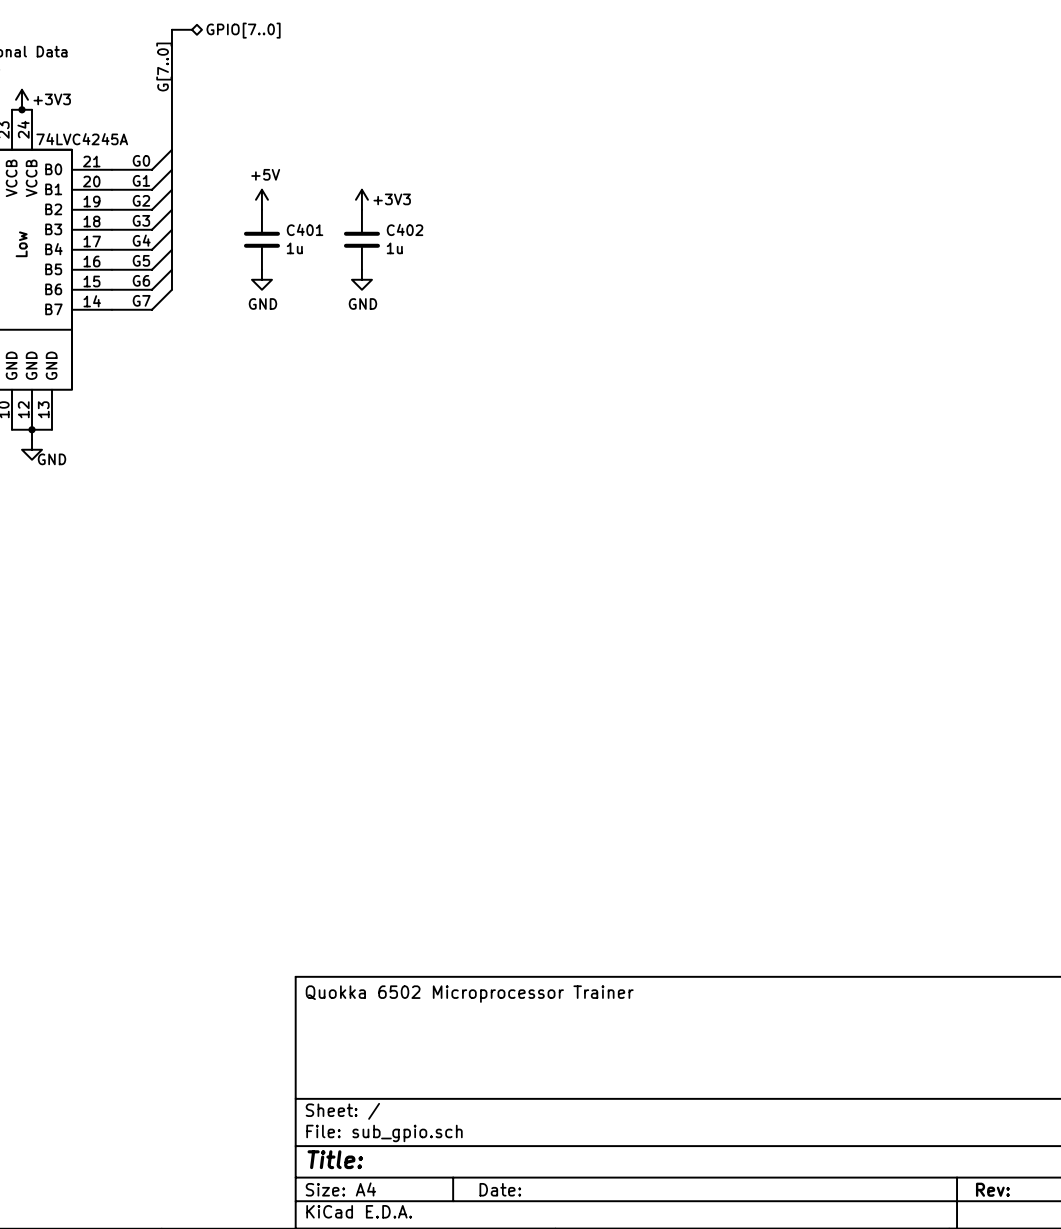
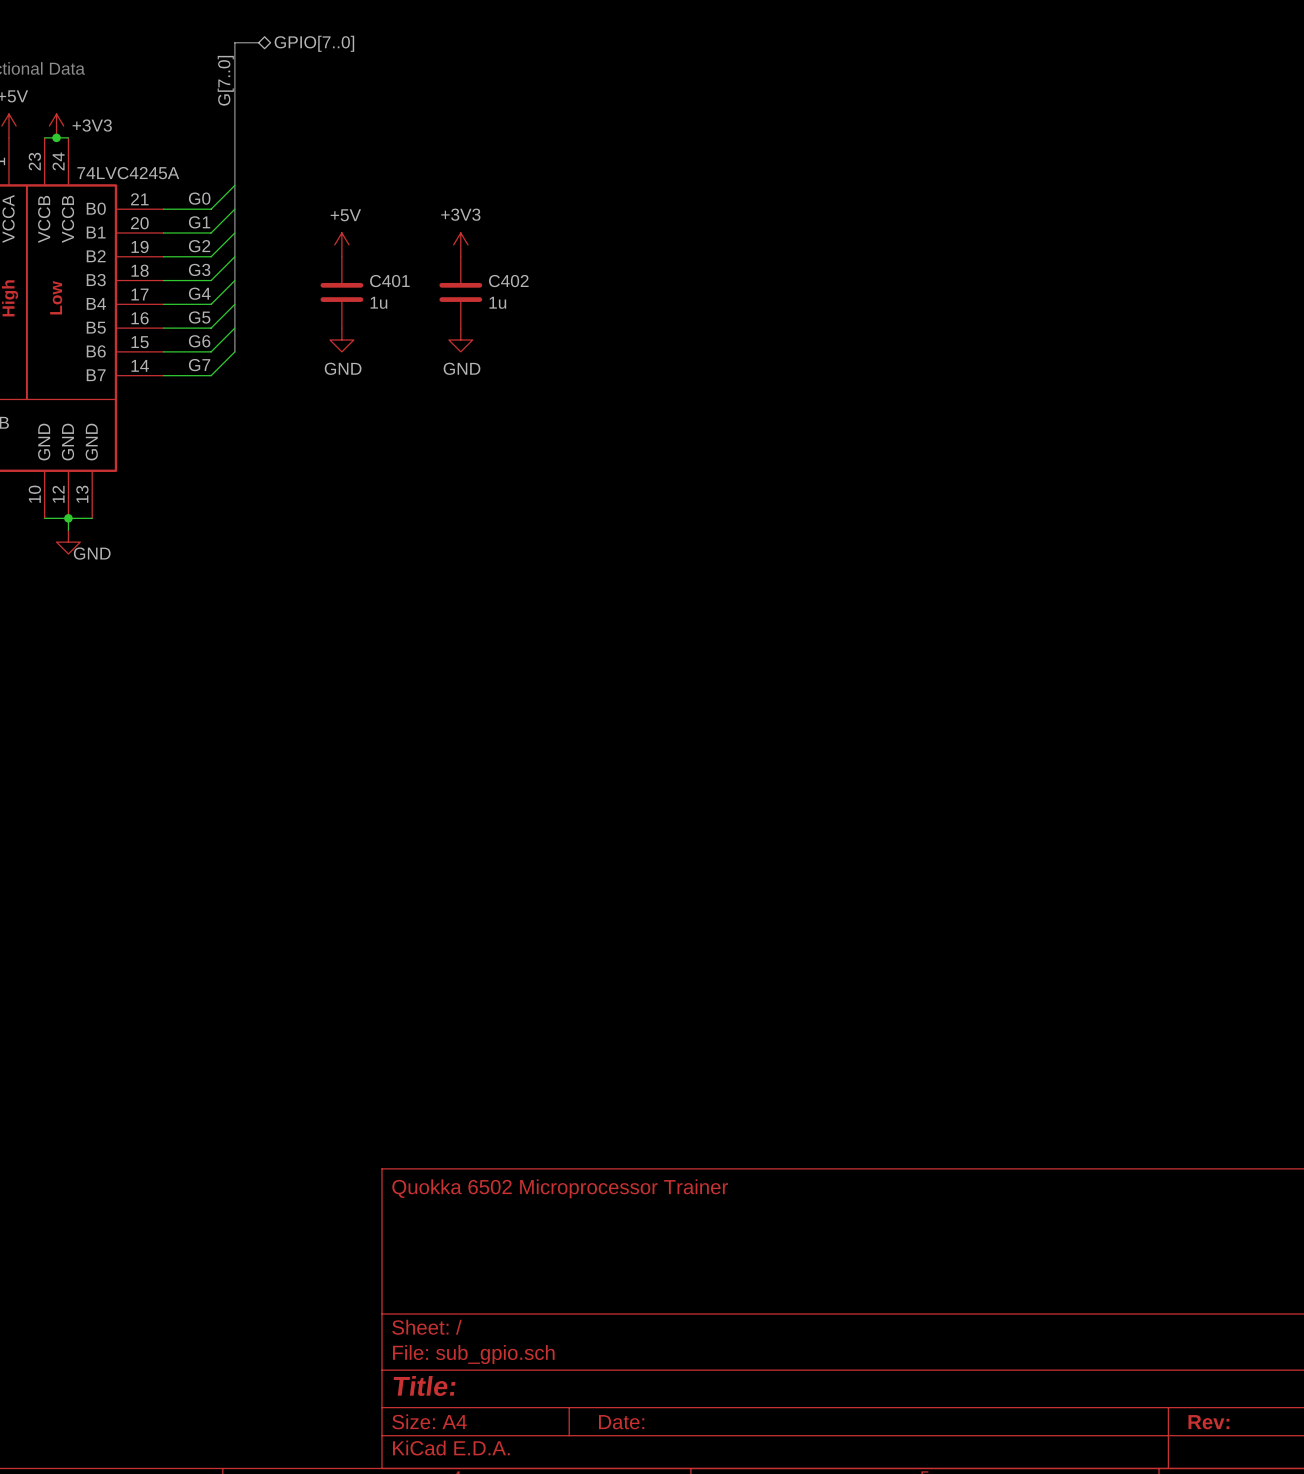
power symbol text position: +3V3 (392, 199) -> +3V3 (460, 214)

